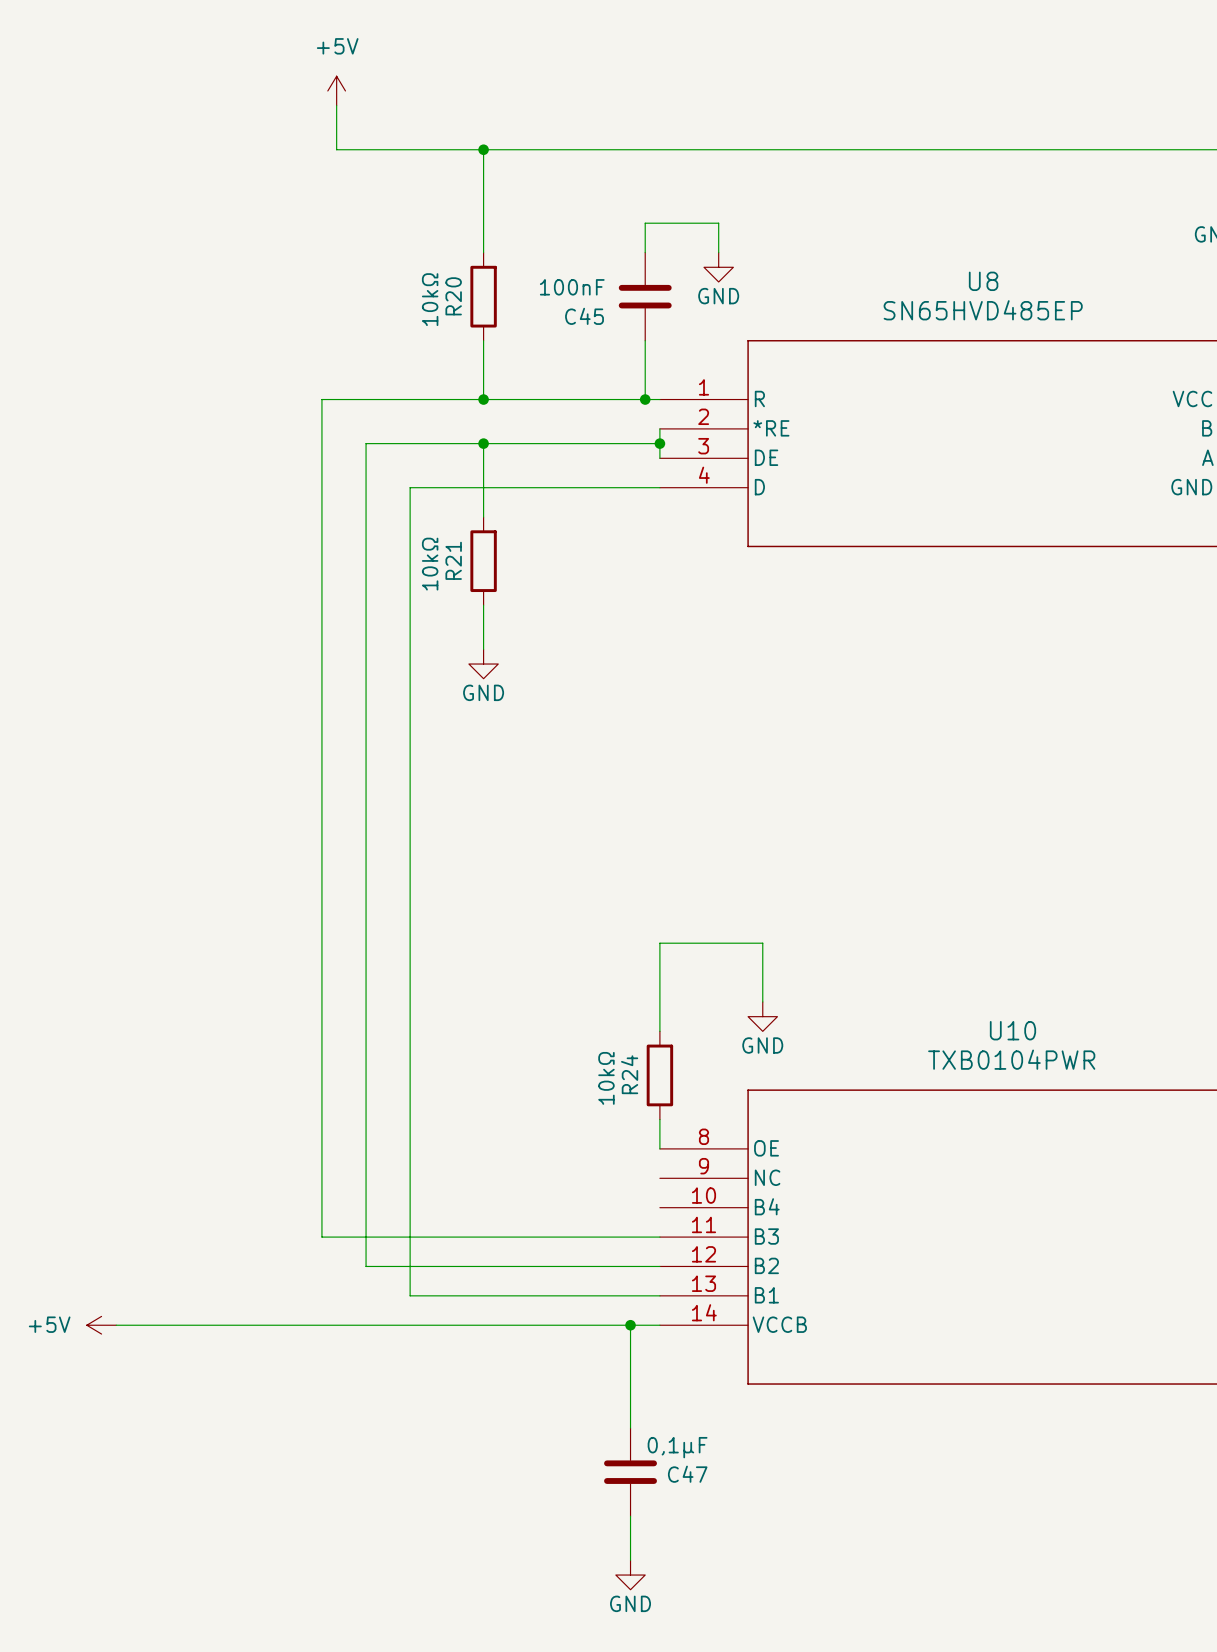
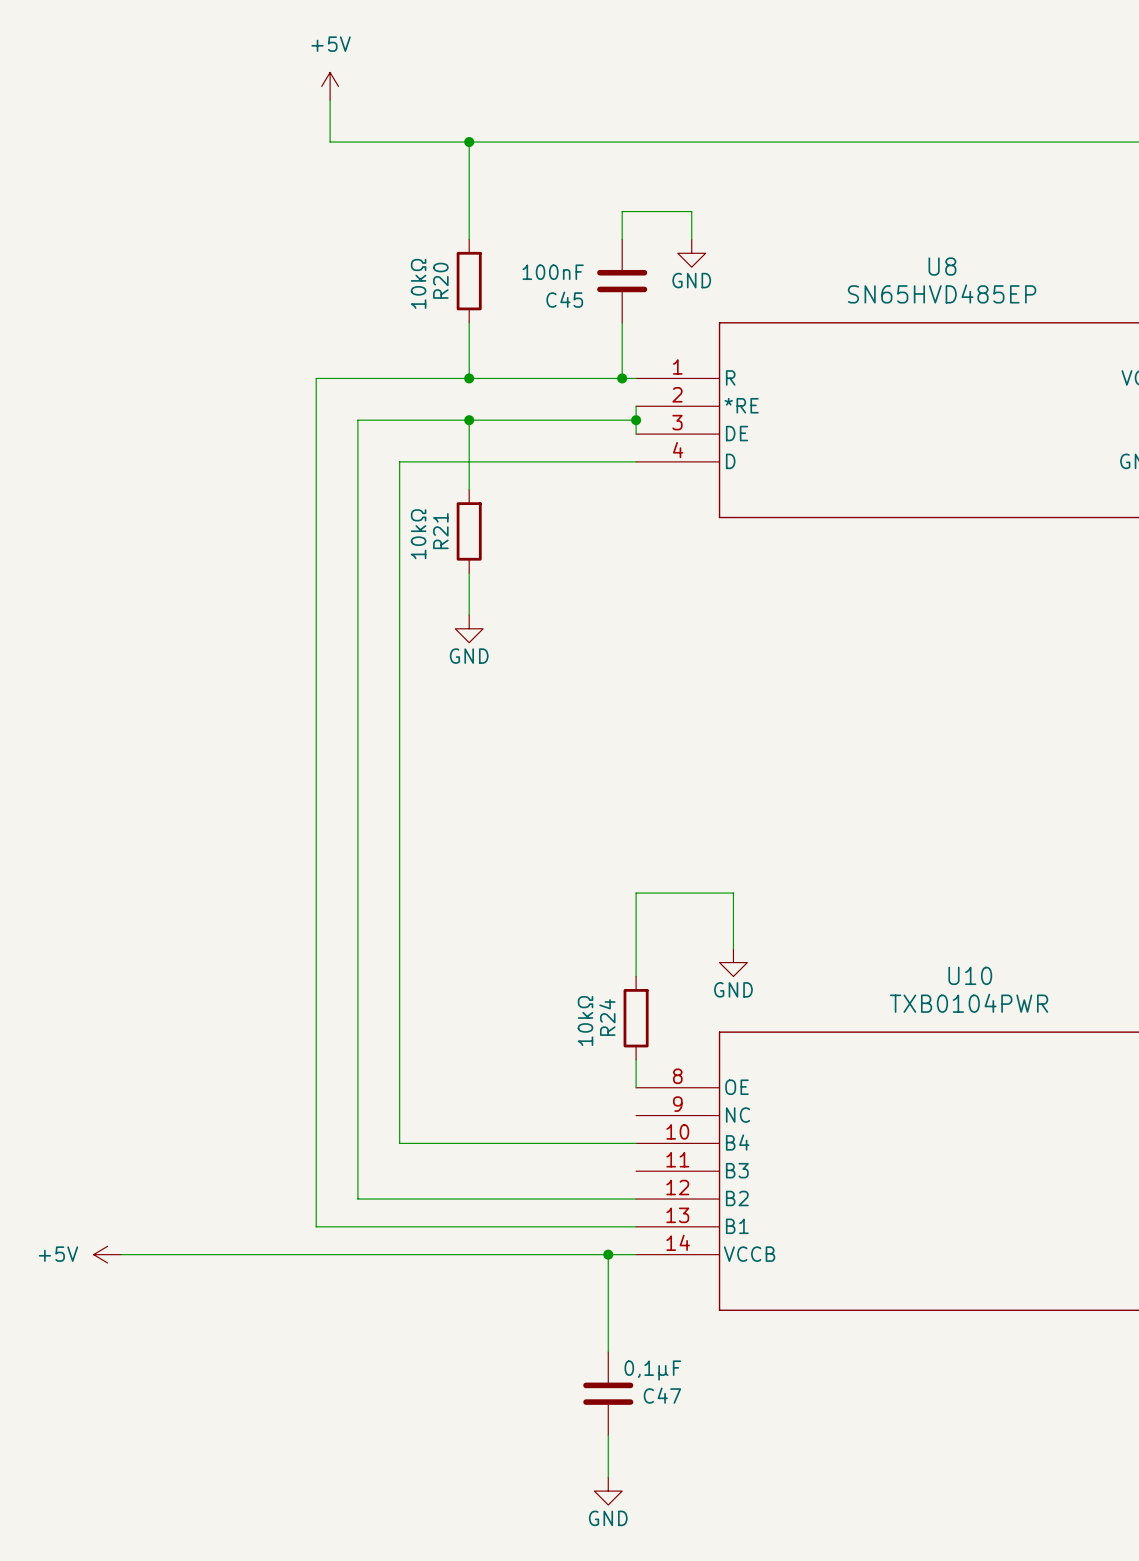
wire: (410, 1207) (410, 1295) -> (316, 1171) (316, 1226) (399, 1226)
wire: none -> (399, 1143) (636, 1143)
wire: (321, 1237) (659, 1237) -> none

